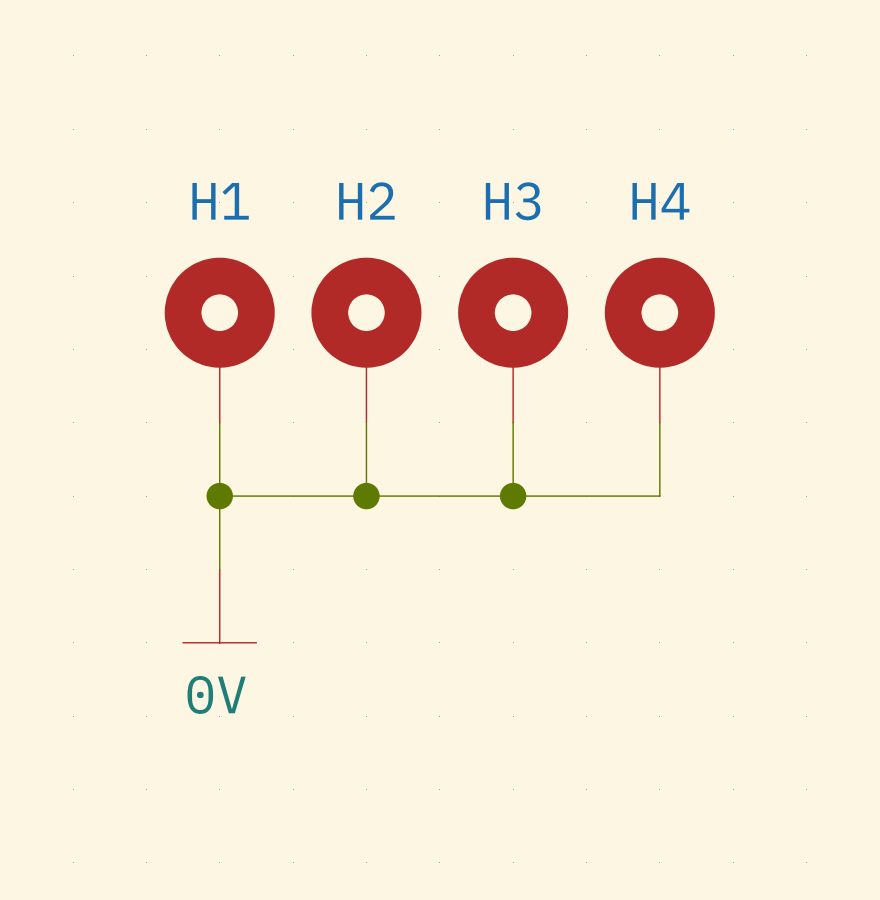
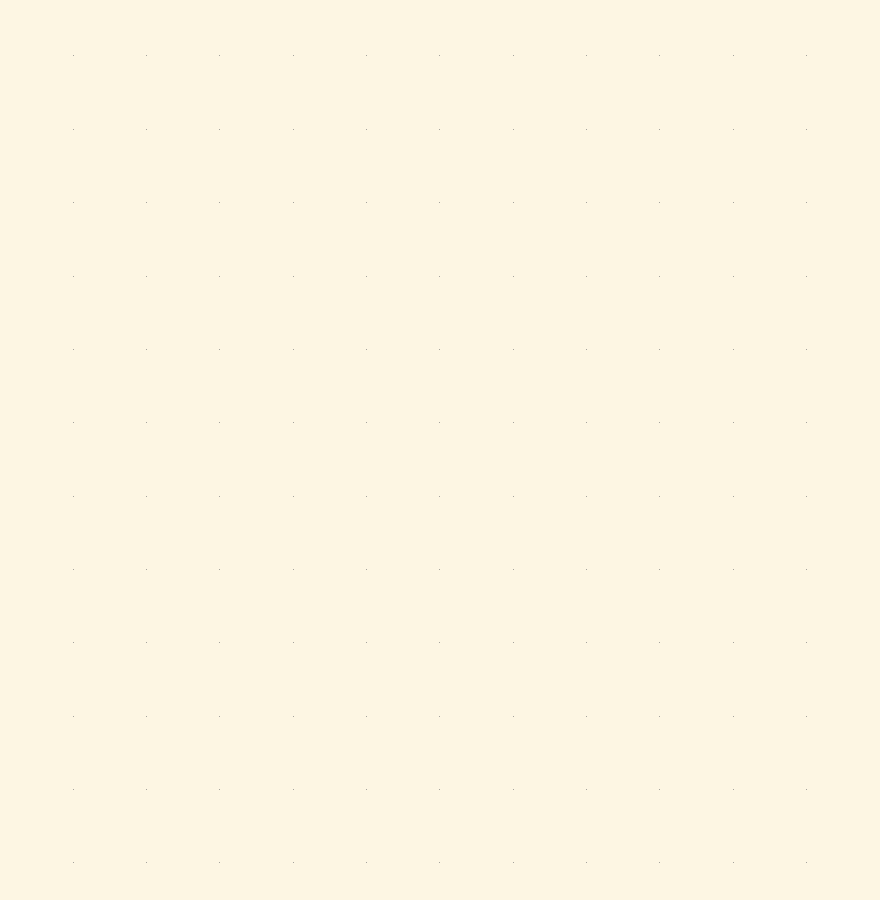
H1: (219, 340) -> none
H2: (366, 340) -> none
H3: (513, 340) -> none
H4: (659, 340) -> none
wire: (219, 422) (219, 569) -> none
wire: (366, 422) (366, 496) -> none
wire: (513, 422) (513, 496) -> none
wire: (659, 422) (659, 496) (219, 496) -> none
junction: (219, 496) -> none
junction: (366, 496) -> none
junction: (513, 496) -> none
power symbol: 0V (219, 606) -> none

